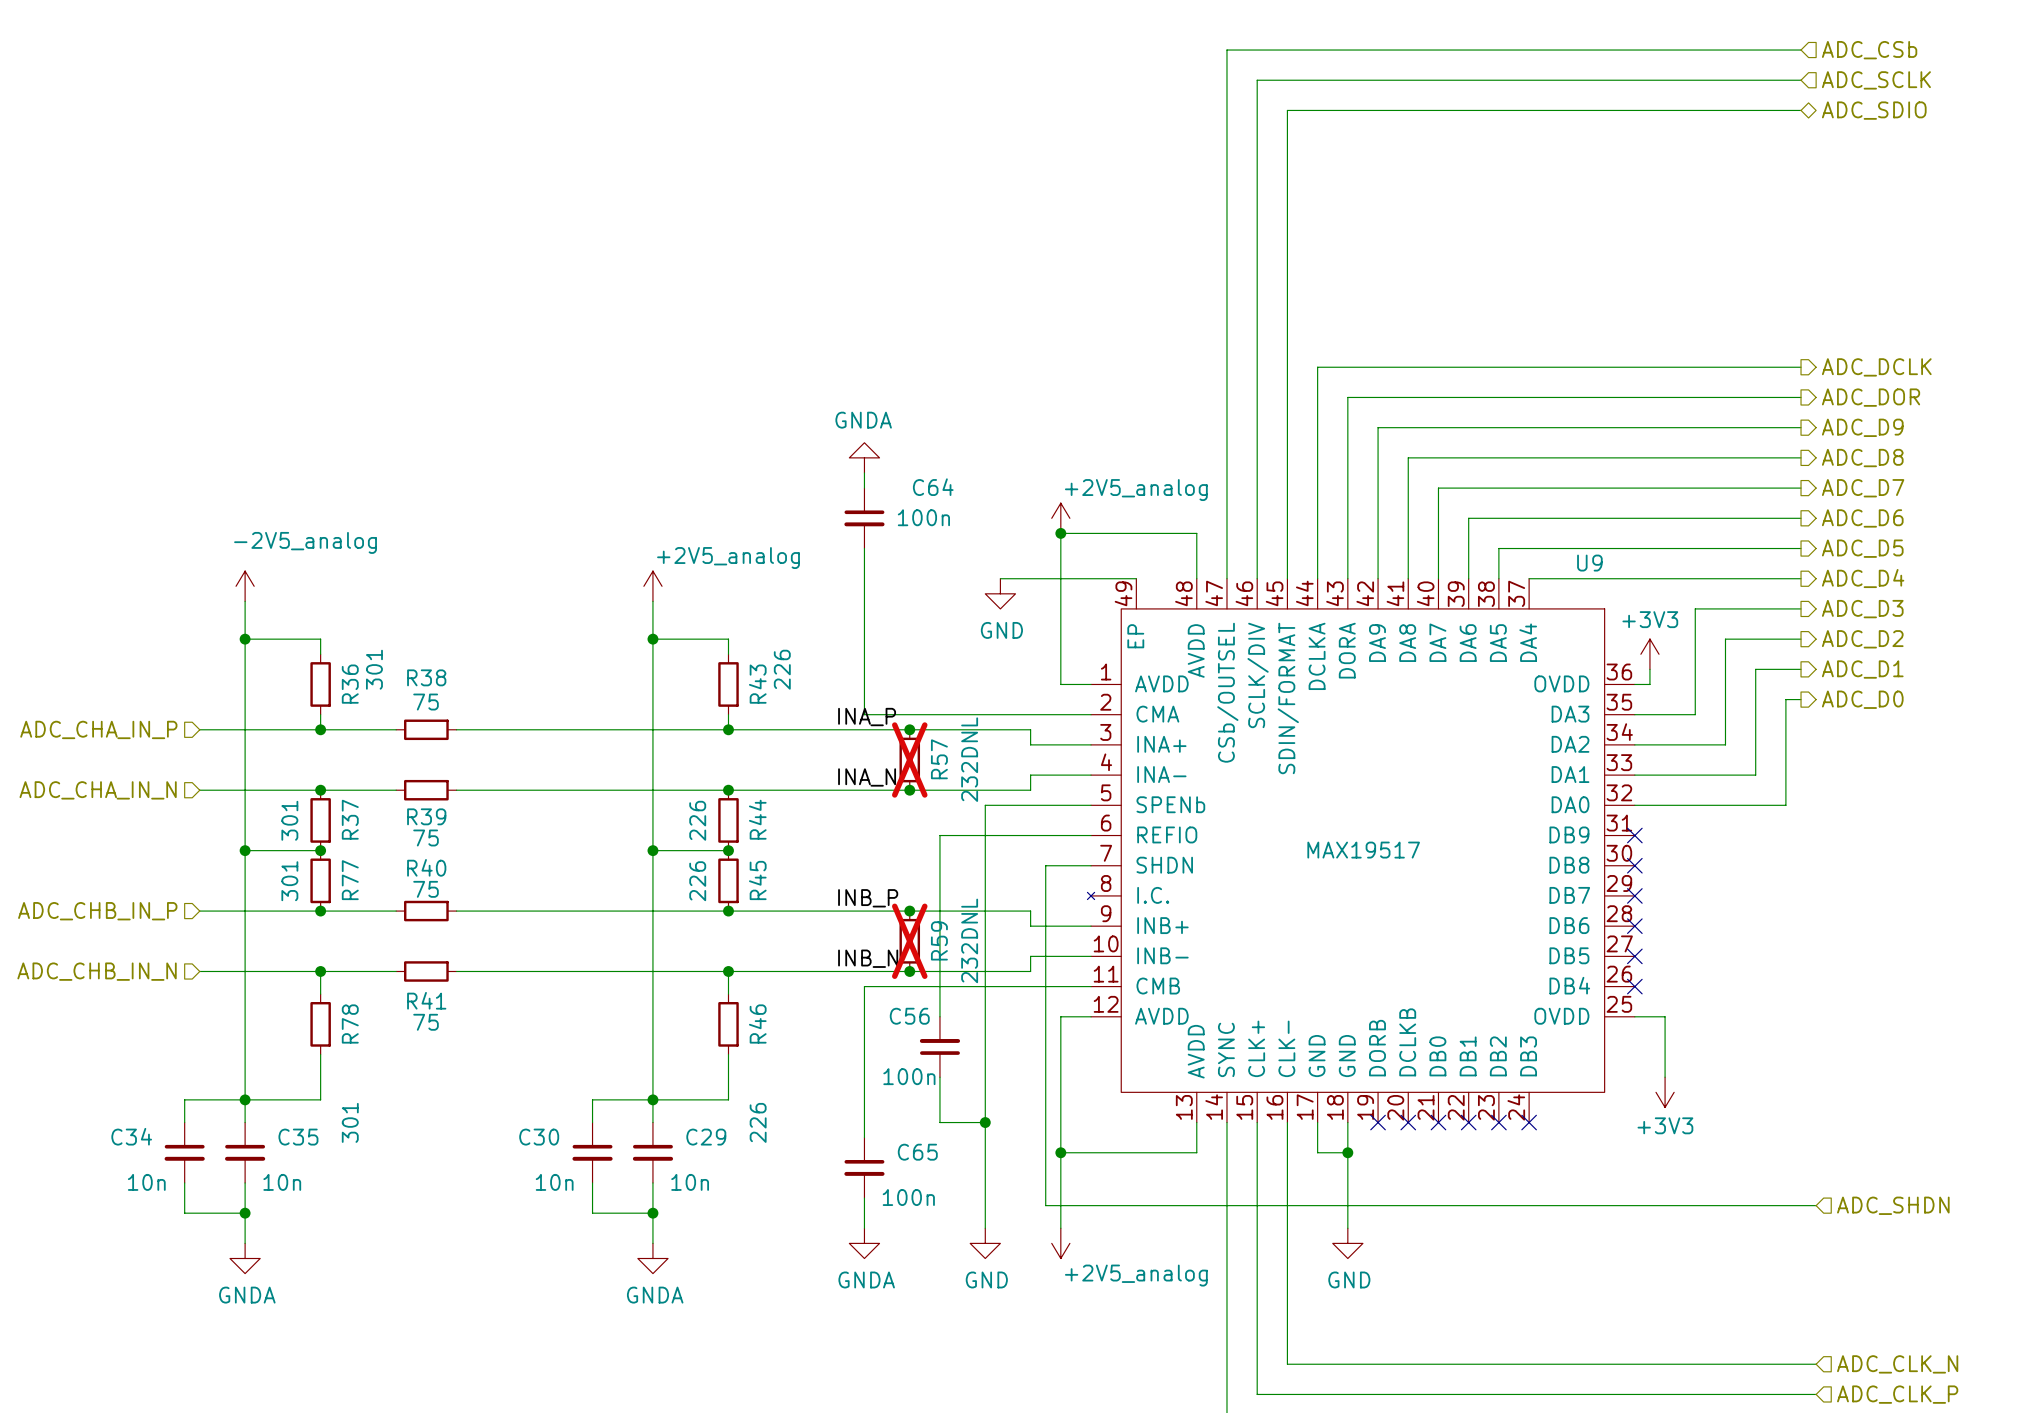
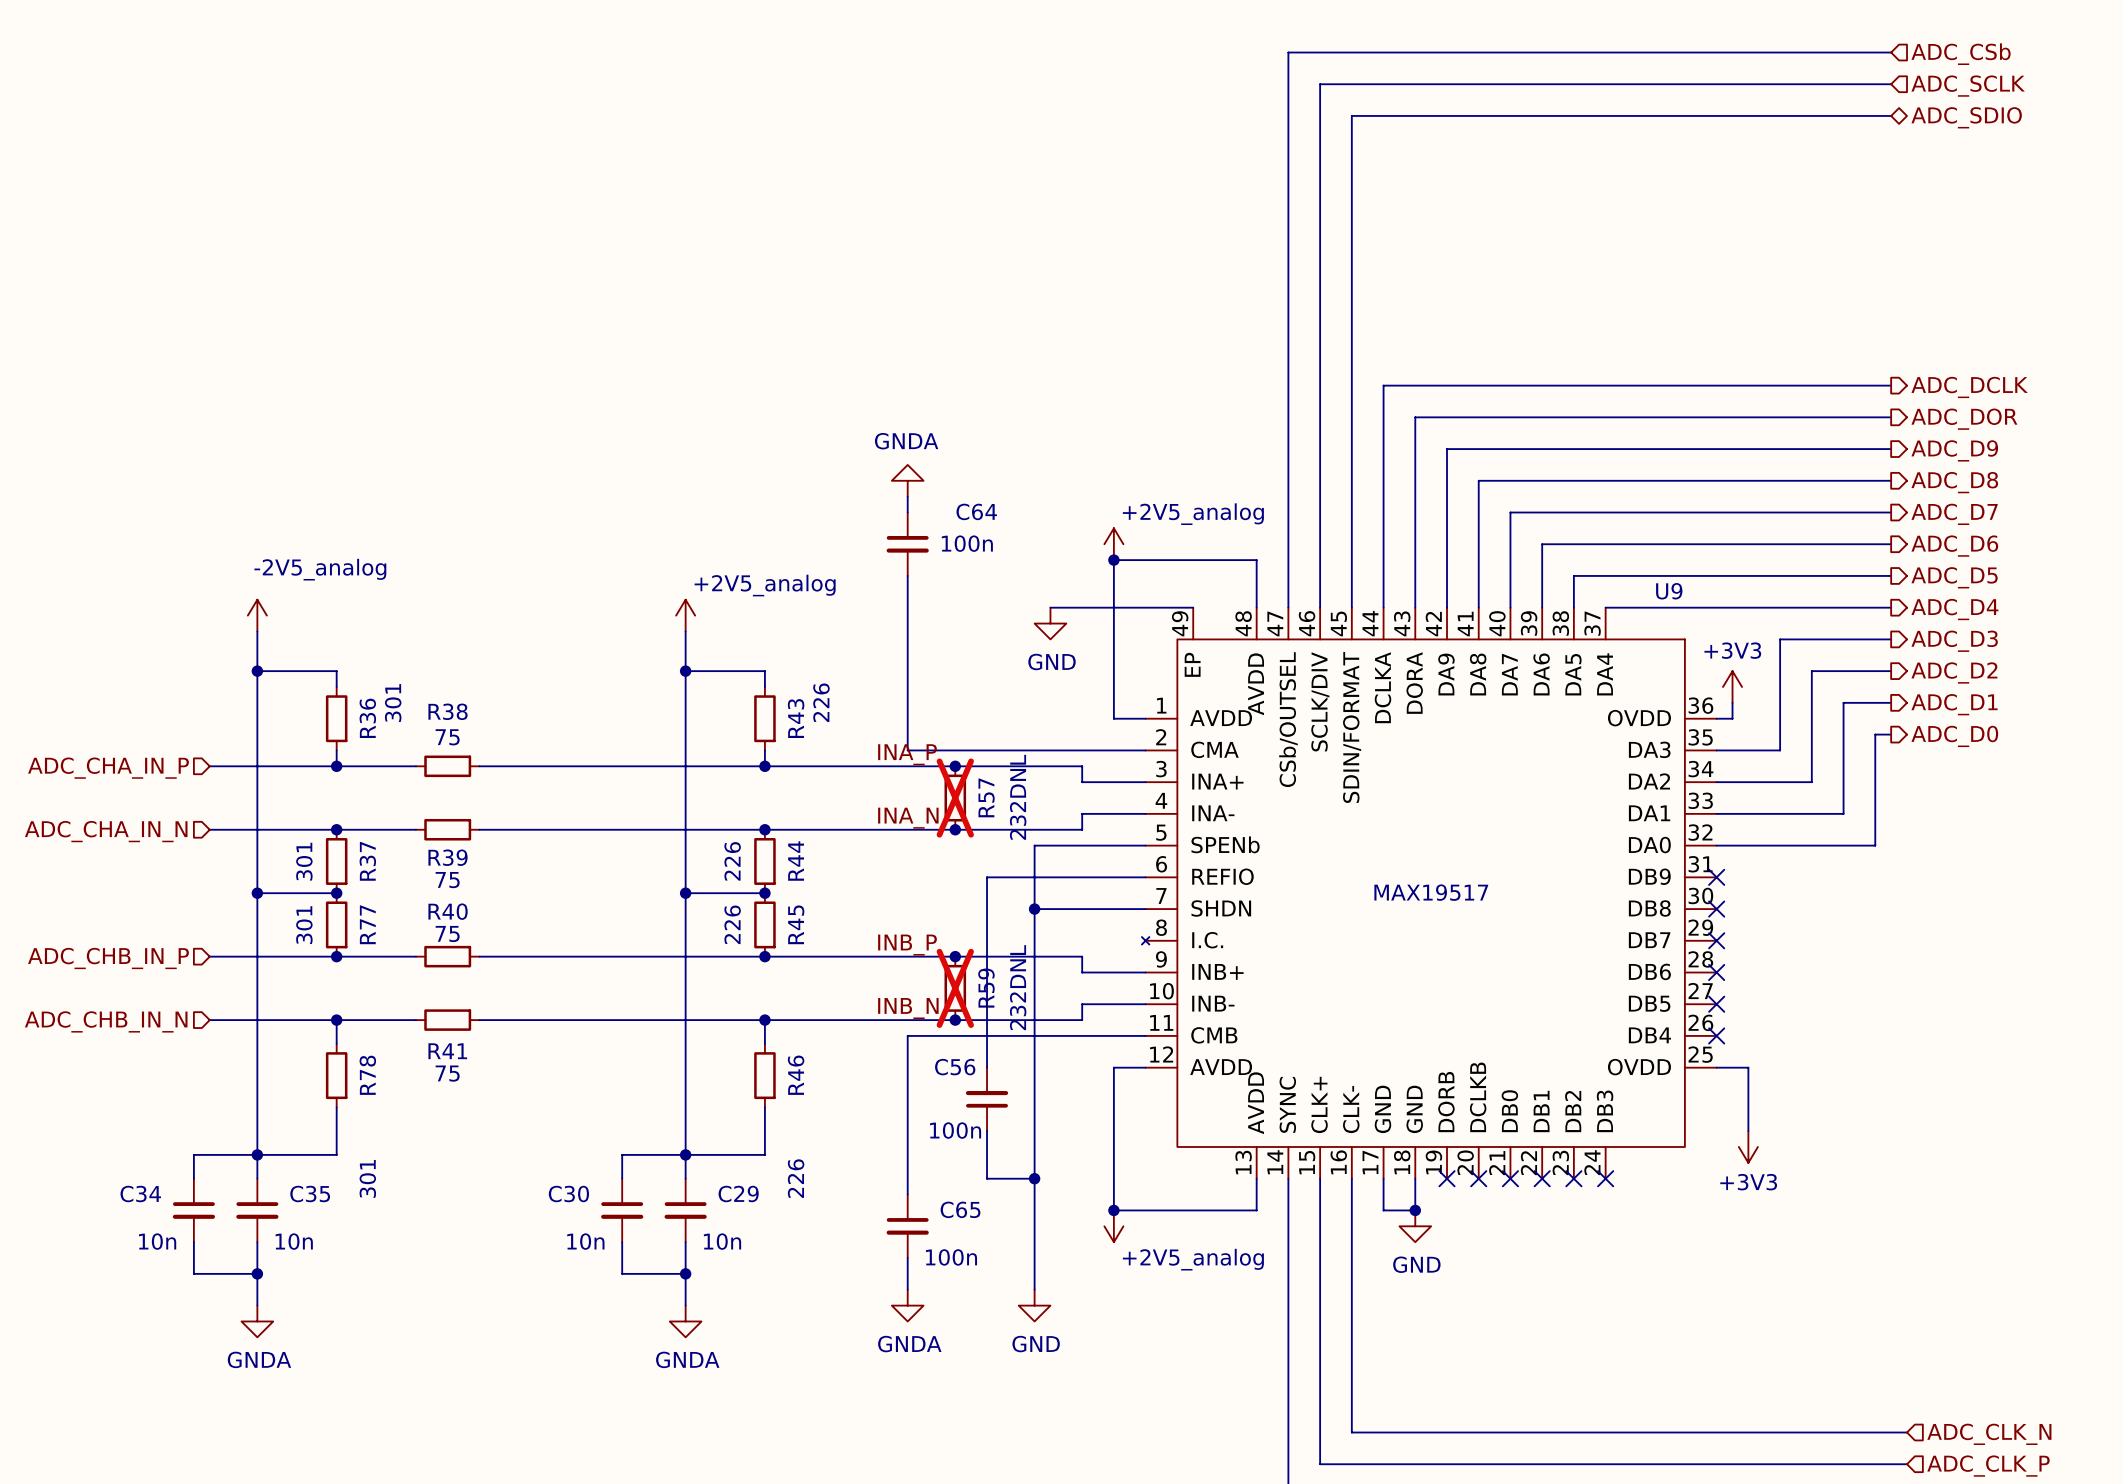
junction: none -> (1034, 909)
wire: (1045, 865) (1045, 1205) (1816, 1205) -> (1098, 909) (1034, 909)
wire: (1060, 1152) (1060, 1228) -> none
wire: (1347, 1152) (1347, 1228) -> none
hierarchical label: ADC_SHDN (1893, 1205) -> none
power symbol position: +2V5_analog (1060, 1243) -> +2V5_analog (1113, 1226)
power symbol position: GND (1347, 1243) -> GND (1415, 1226)

